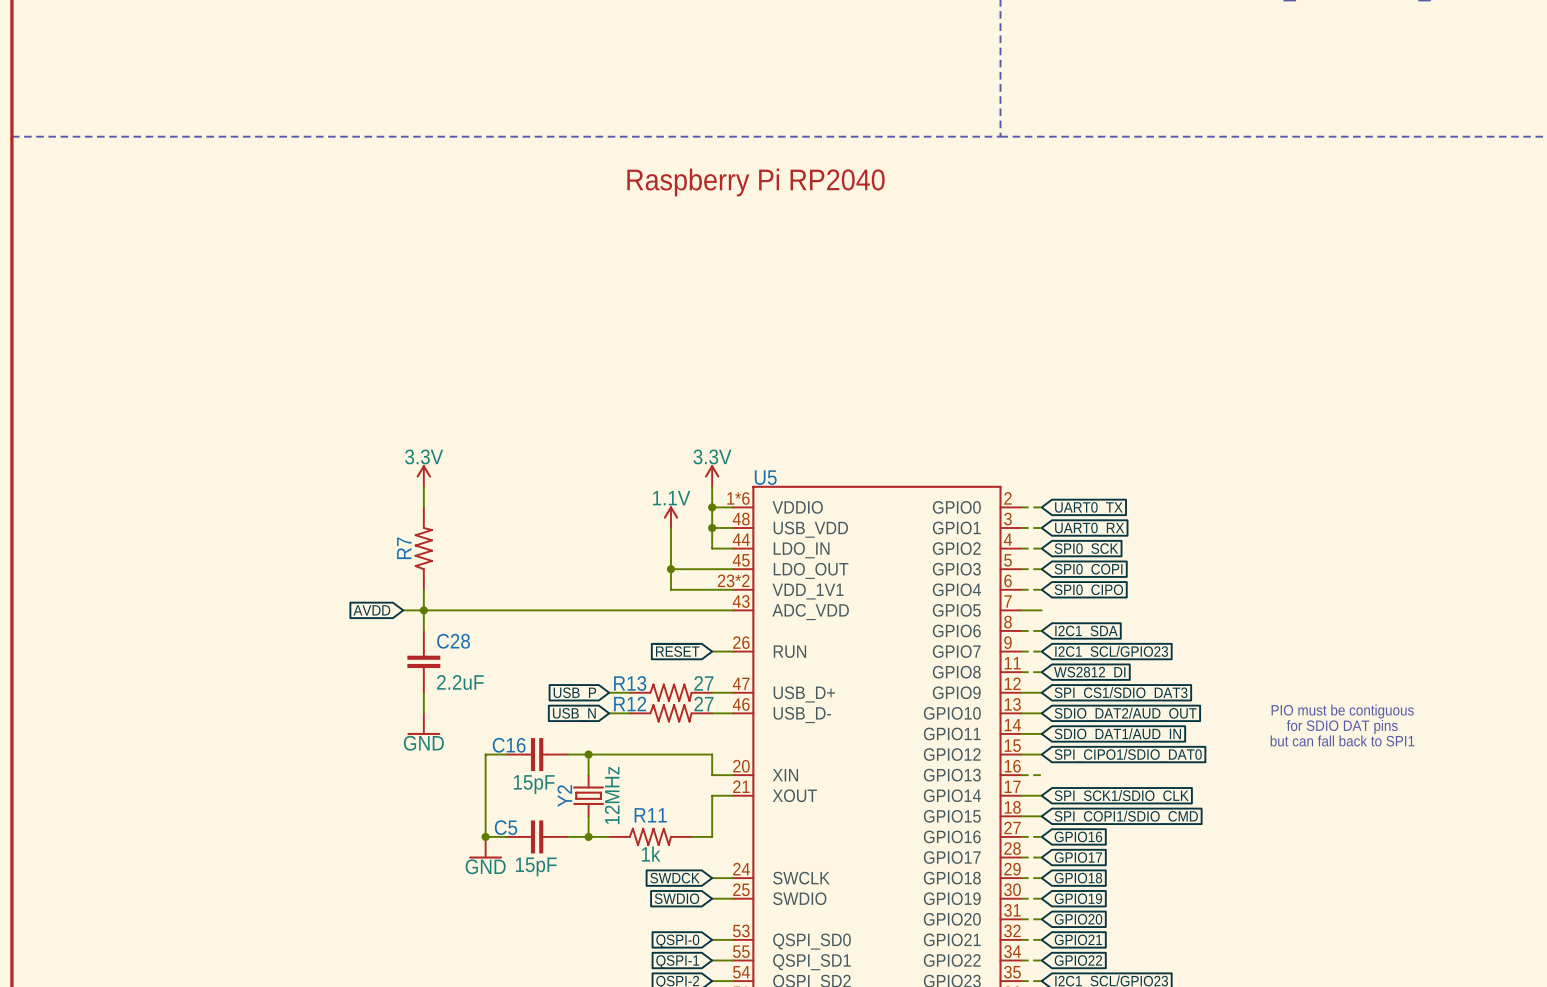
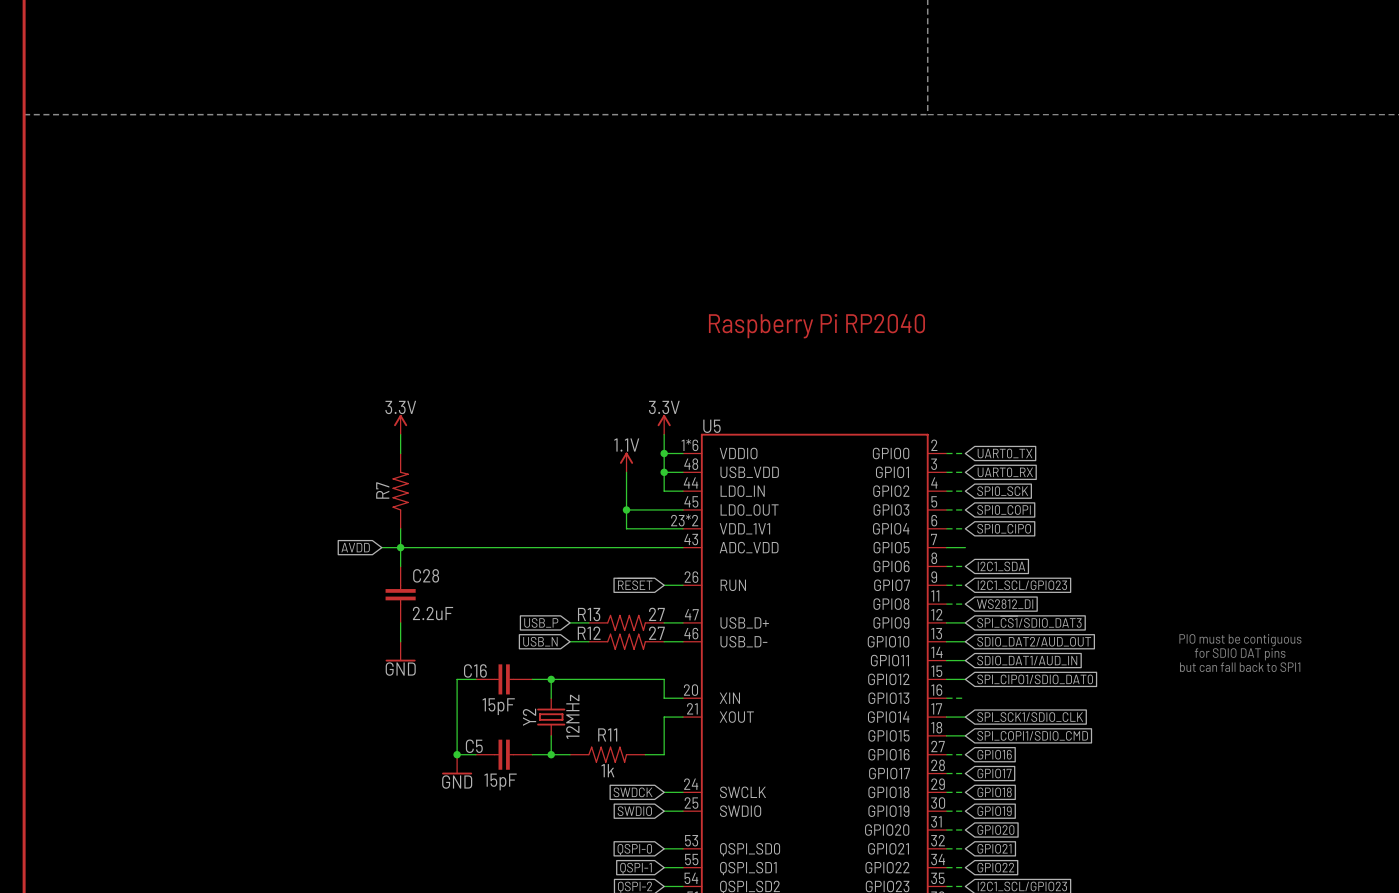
text: Raspberry Pi RP2040 (755, 182) -> none
text: none -> Raspberry Pi RP2040 (816, 326)

